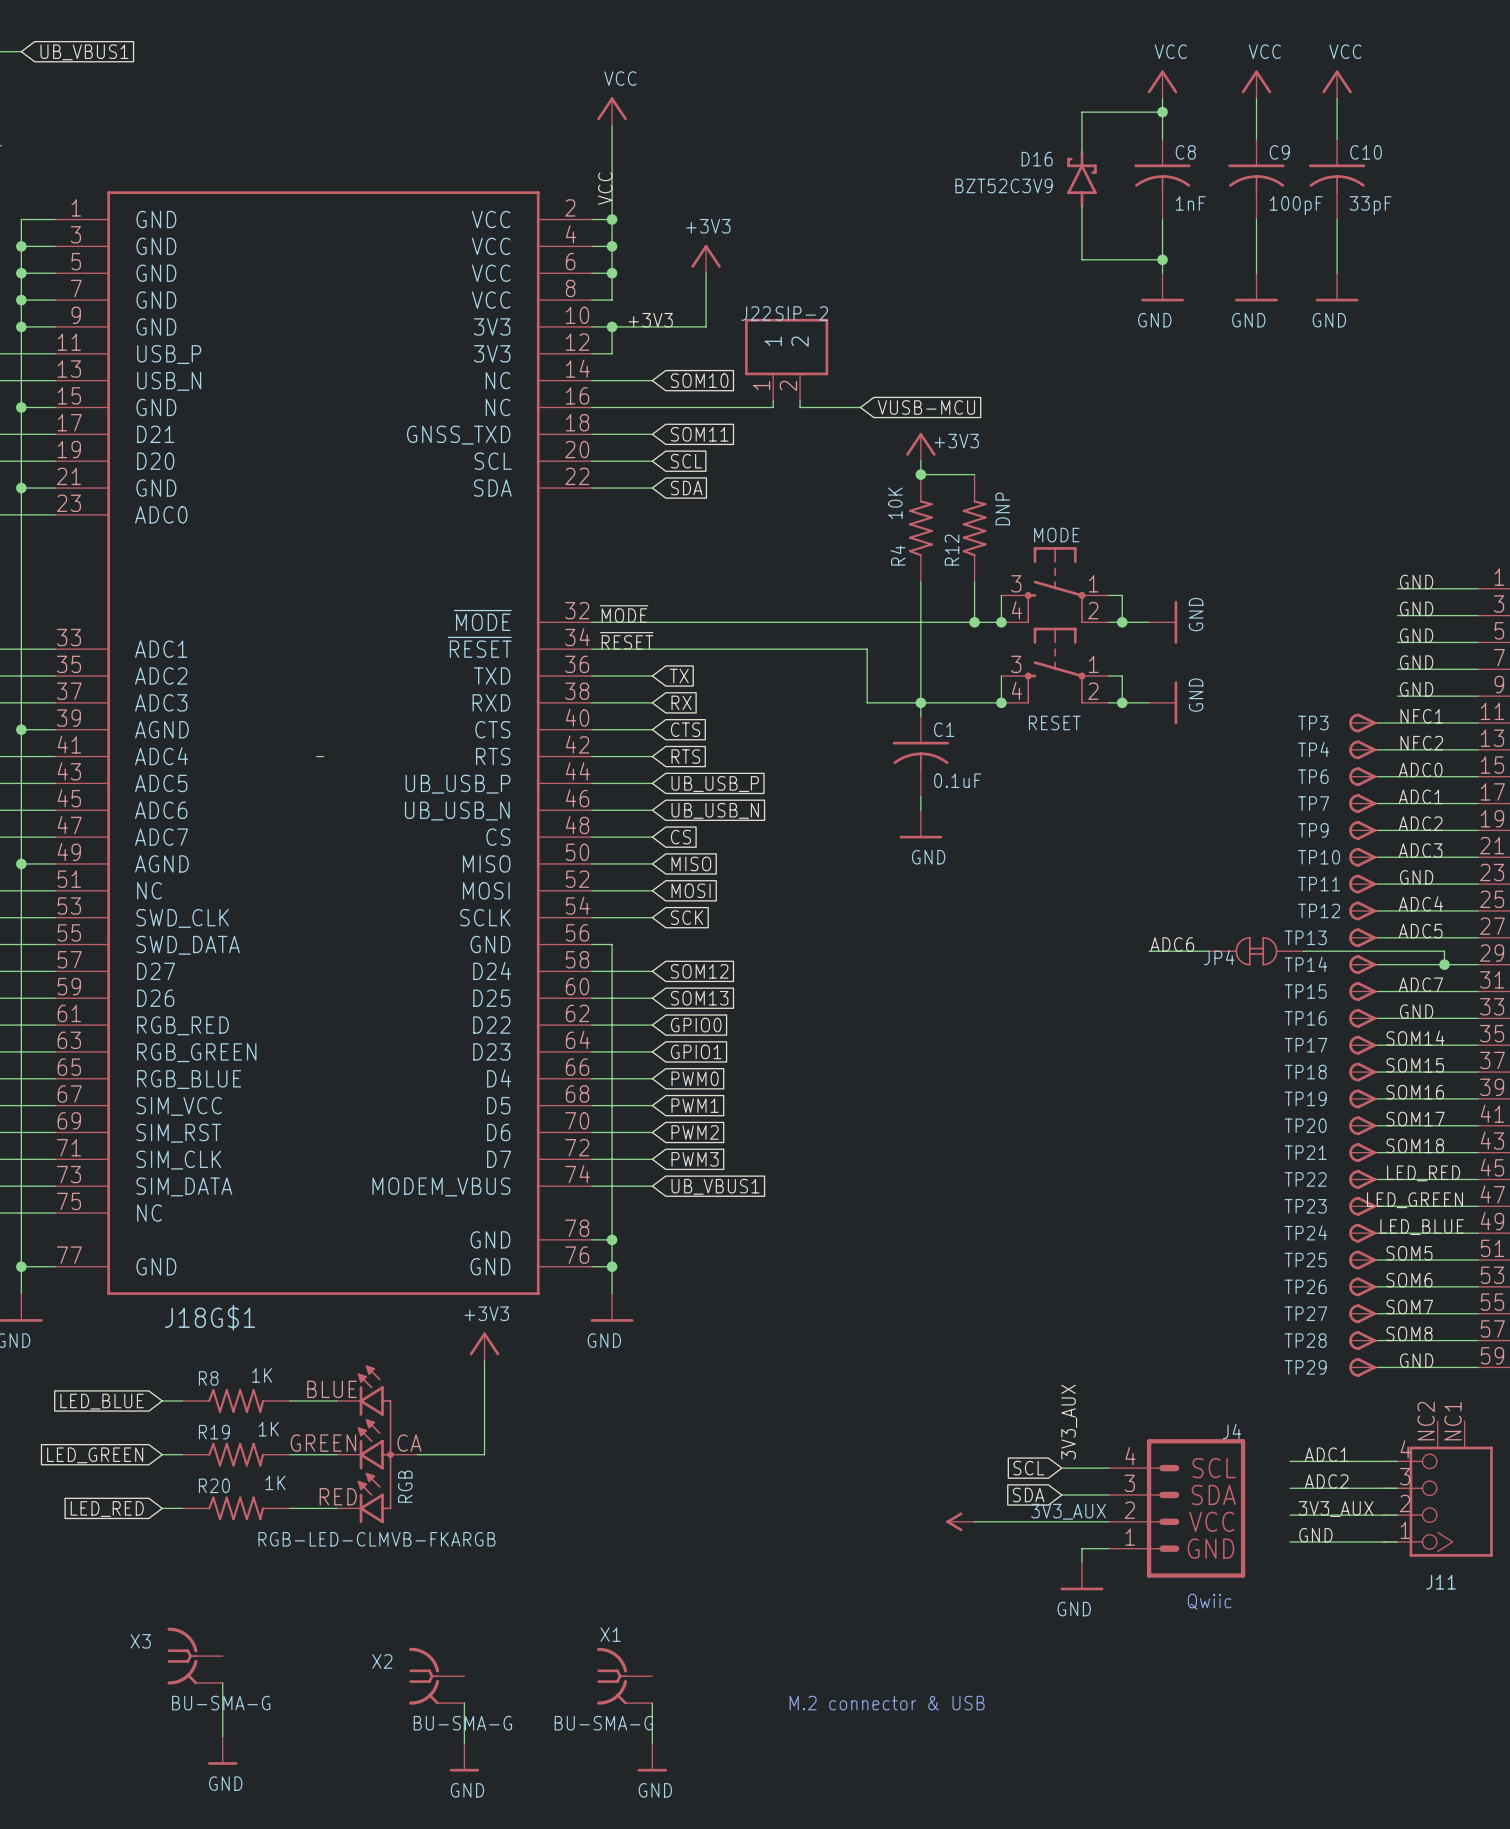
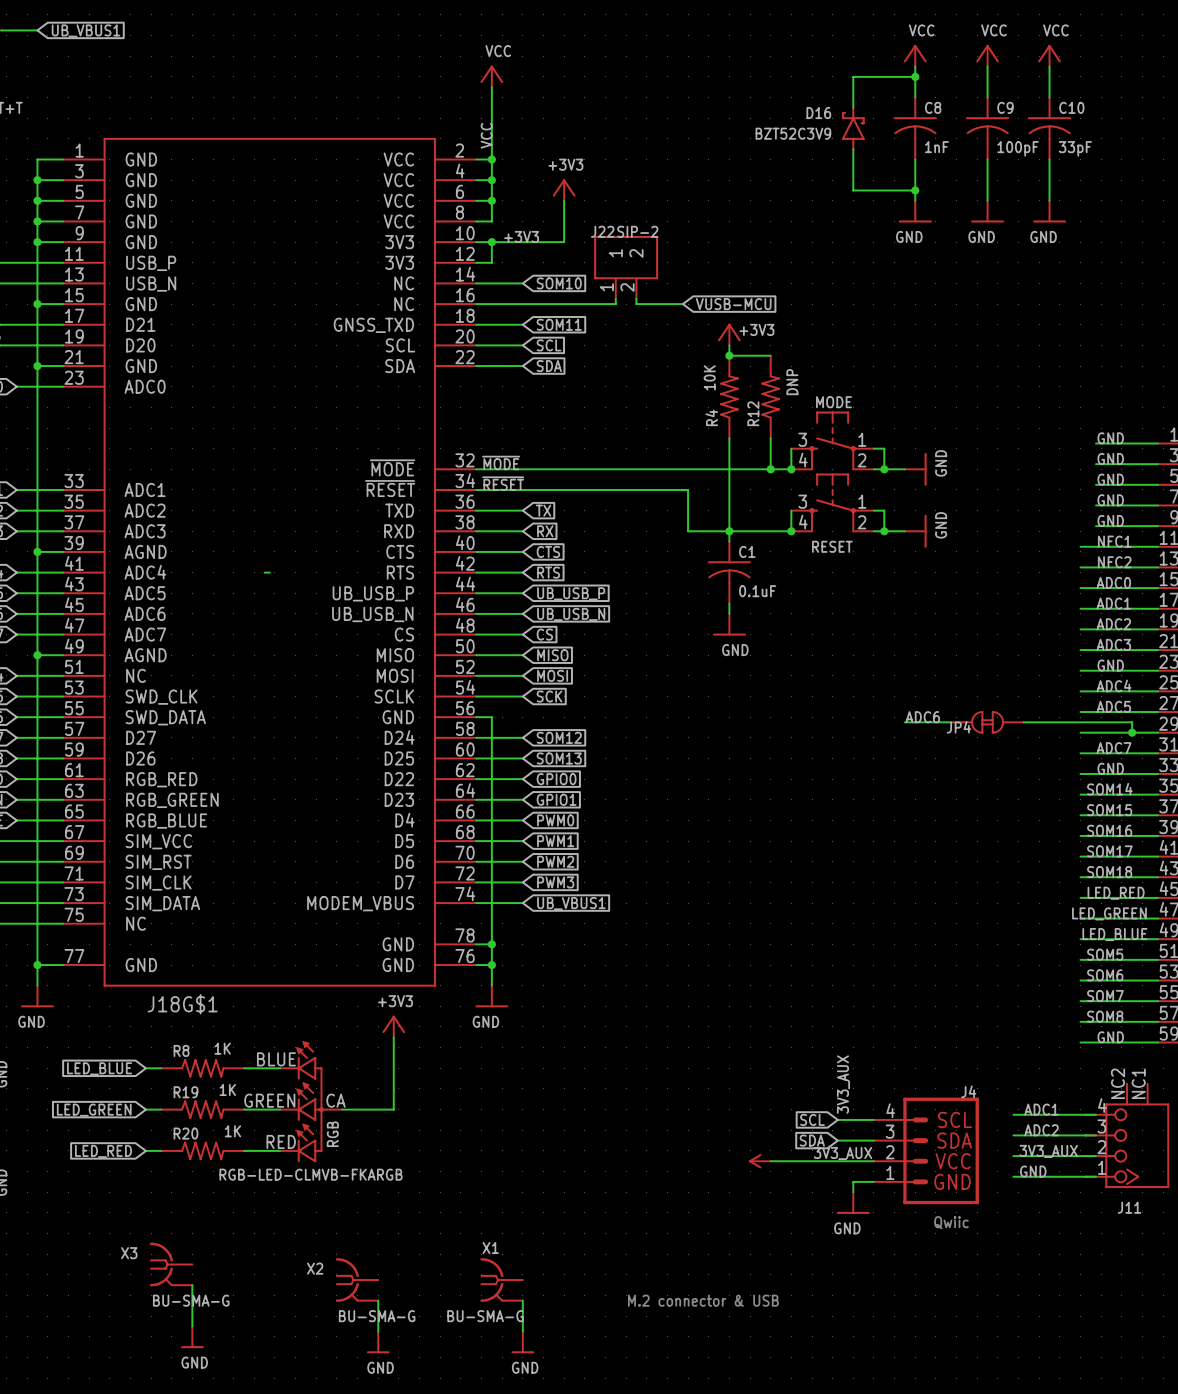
TP3: (1363, 722) -> none
TP4: (1363, 749) -> none
TP6: (1363, 776) -> none
TP7: (1363, 803) -> none
TP9: (1363, 830) -> none
TP10: (1363, 857) -> none
TP11: (1363, 884) -> none
TP12: (1363, 910) -> none
TP13: (1363, 937) -> none
TP14: (1363, 964) -> none
TP15: (1363, 991) -> none
TP16: (1363, 1018) -> none
TP17: (1363, 1045) -> none
TP18: (1363, 1072) -> none
TP19: (1363, 1098) -> none
TP20: (1363, 1125) -> none
TP21: (1363, 1152) -> none
TP22: (1363, 1179) -> none
TP23: (1363, 1206) -> none
TP24: (1363, 1233) -> none
TP25: (1363, 1260) -> none
TP26: (1363, 1286) -> none
TP27: (1363, 1313) -> none
TP28: (1363, 1340) -> none
TP29: (1363, 1367) -> none

